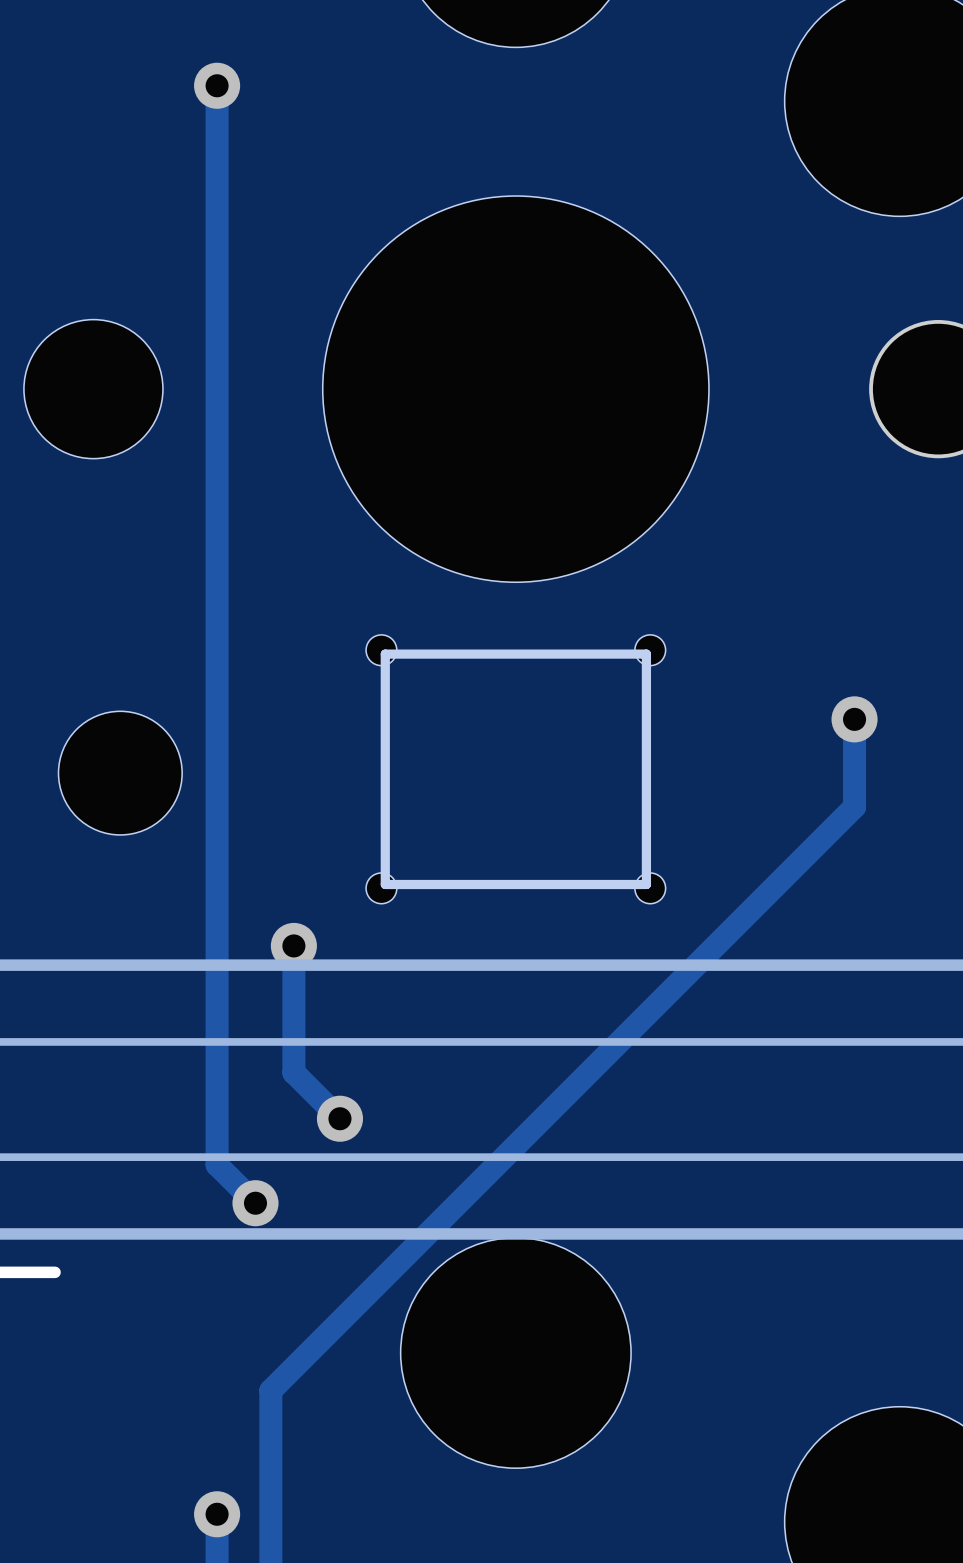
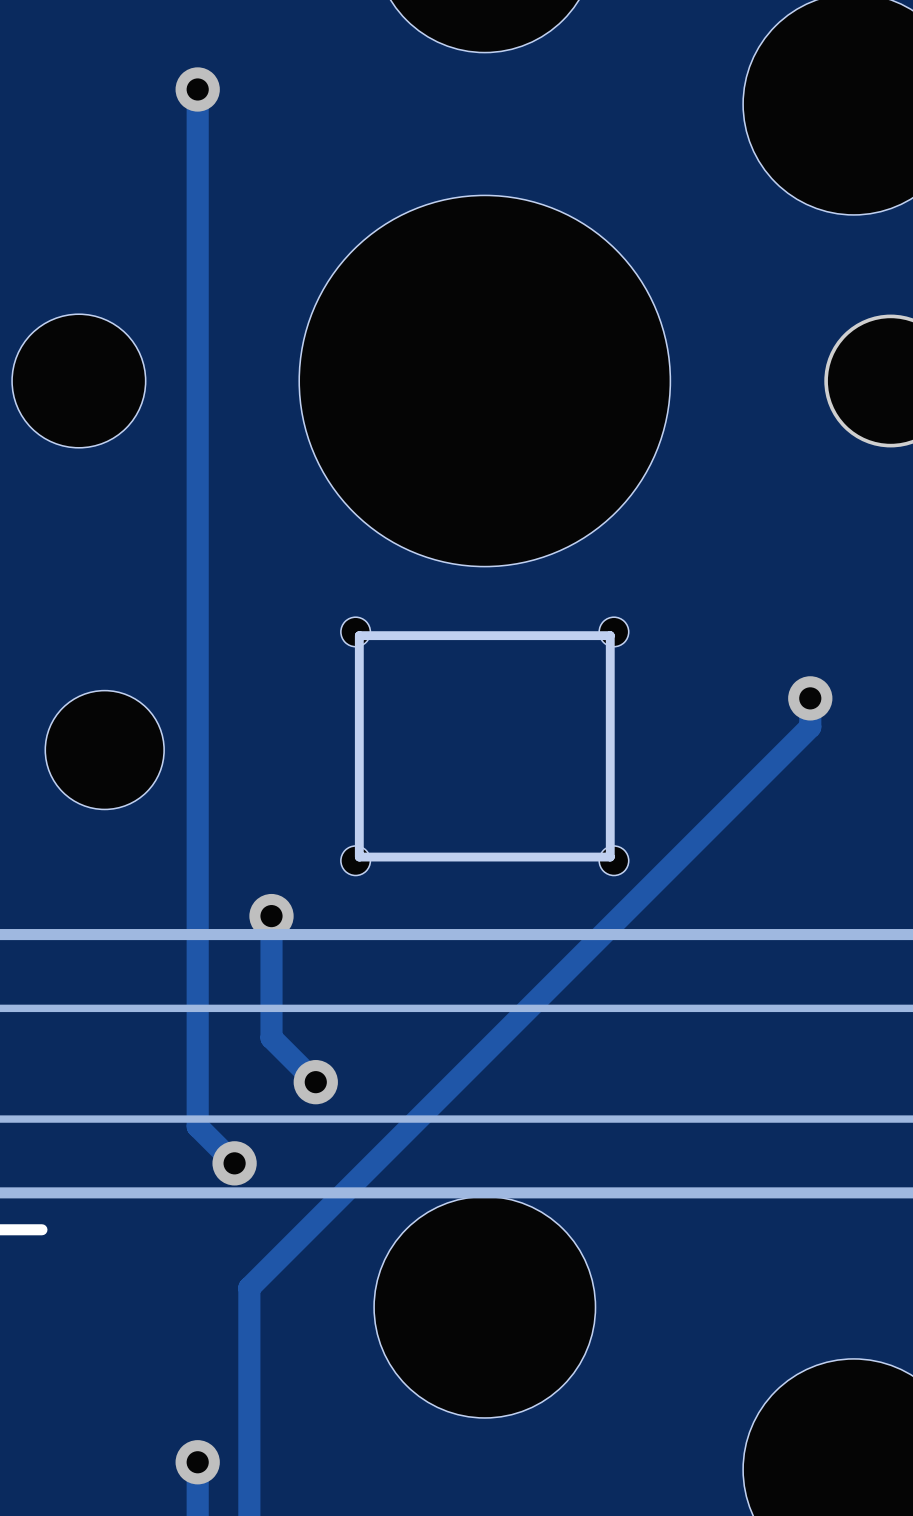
track: (854, 749) (854, 806) (270, 1390) -> (810, 727) (249, 1287) (249, 1343)

